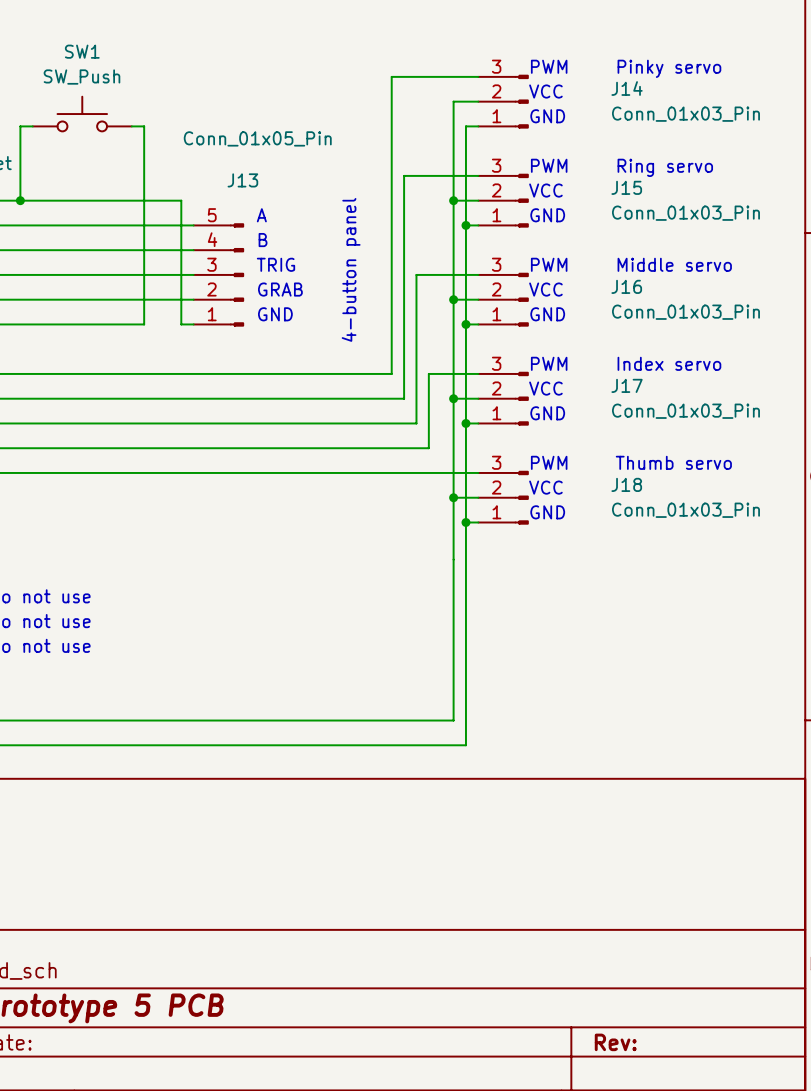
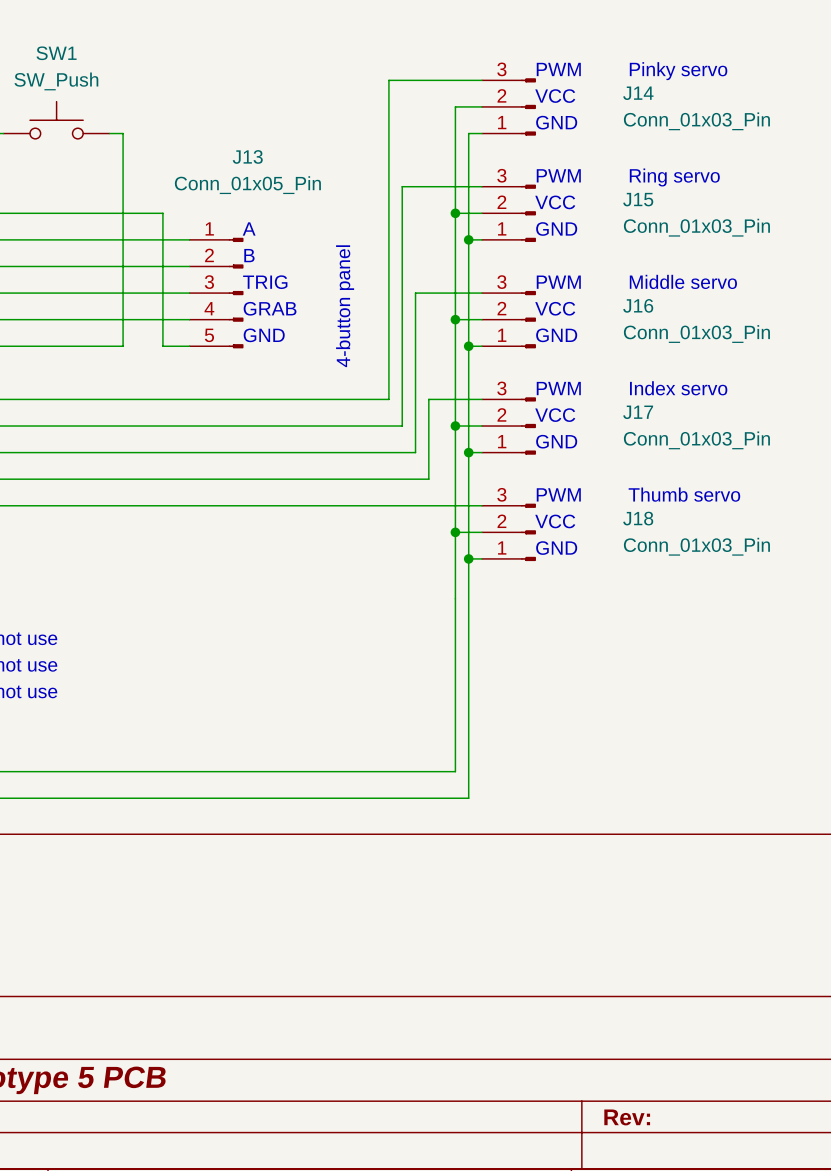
J13 value position: Conn_01x05_Pin (257, 138) -> Conn_01x05_Pin (247, 185)
J13 name position: J13 (242, 180) -> J13 (247, 156)
J13 flip: as is (237, 274) -> up-down (236, 293)

